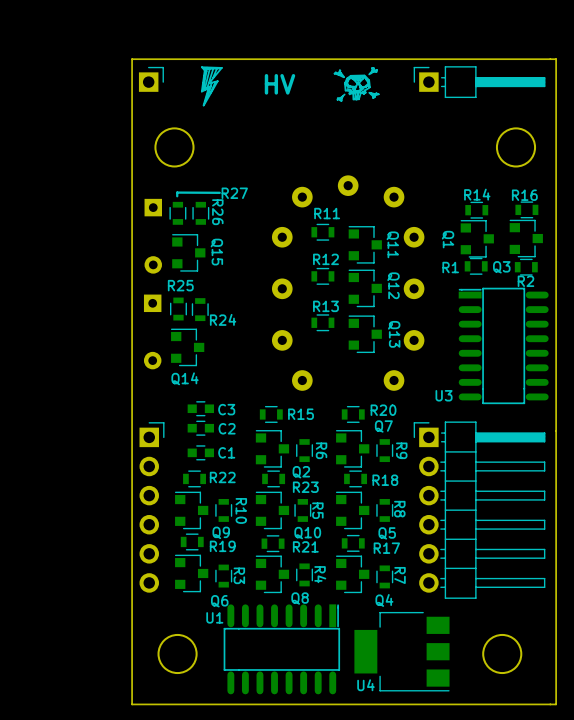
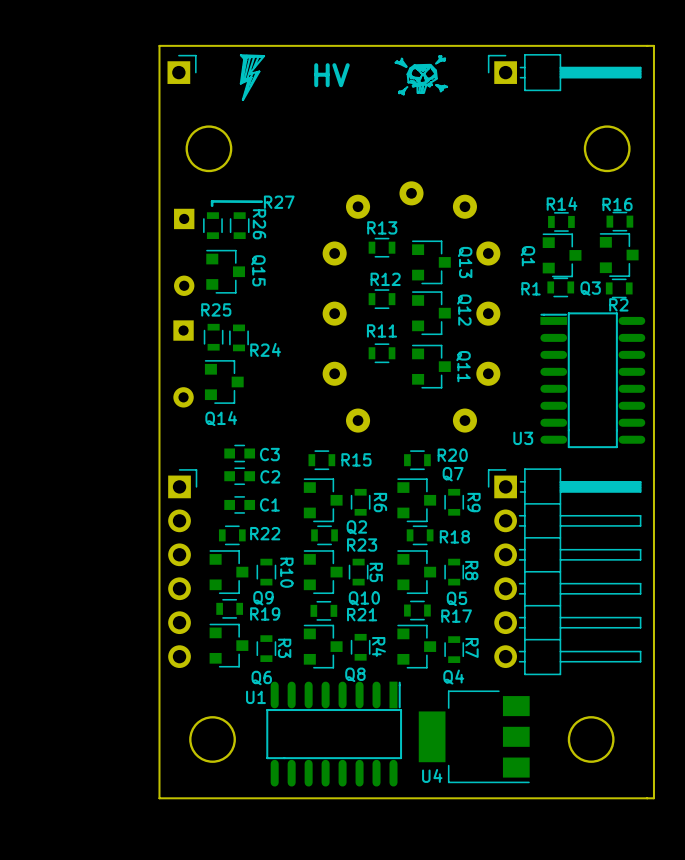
R11 name: R11 (327, 213) -> R13 (382, 227)
Q11 name: Q11 (392, 244) -> Q13 (465, 262)
R13 name: R13 (325, 306) -> R11 (382, 330)
Q13 name: Q13 (394, 334) -> Q11 (463, 366)

